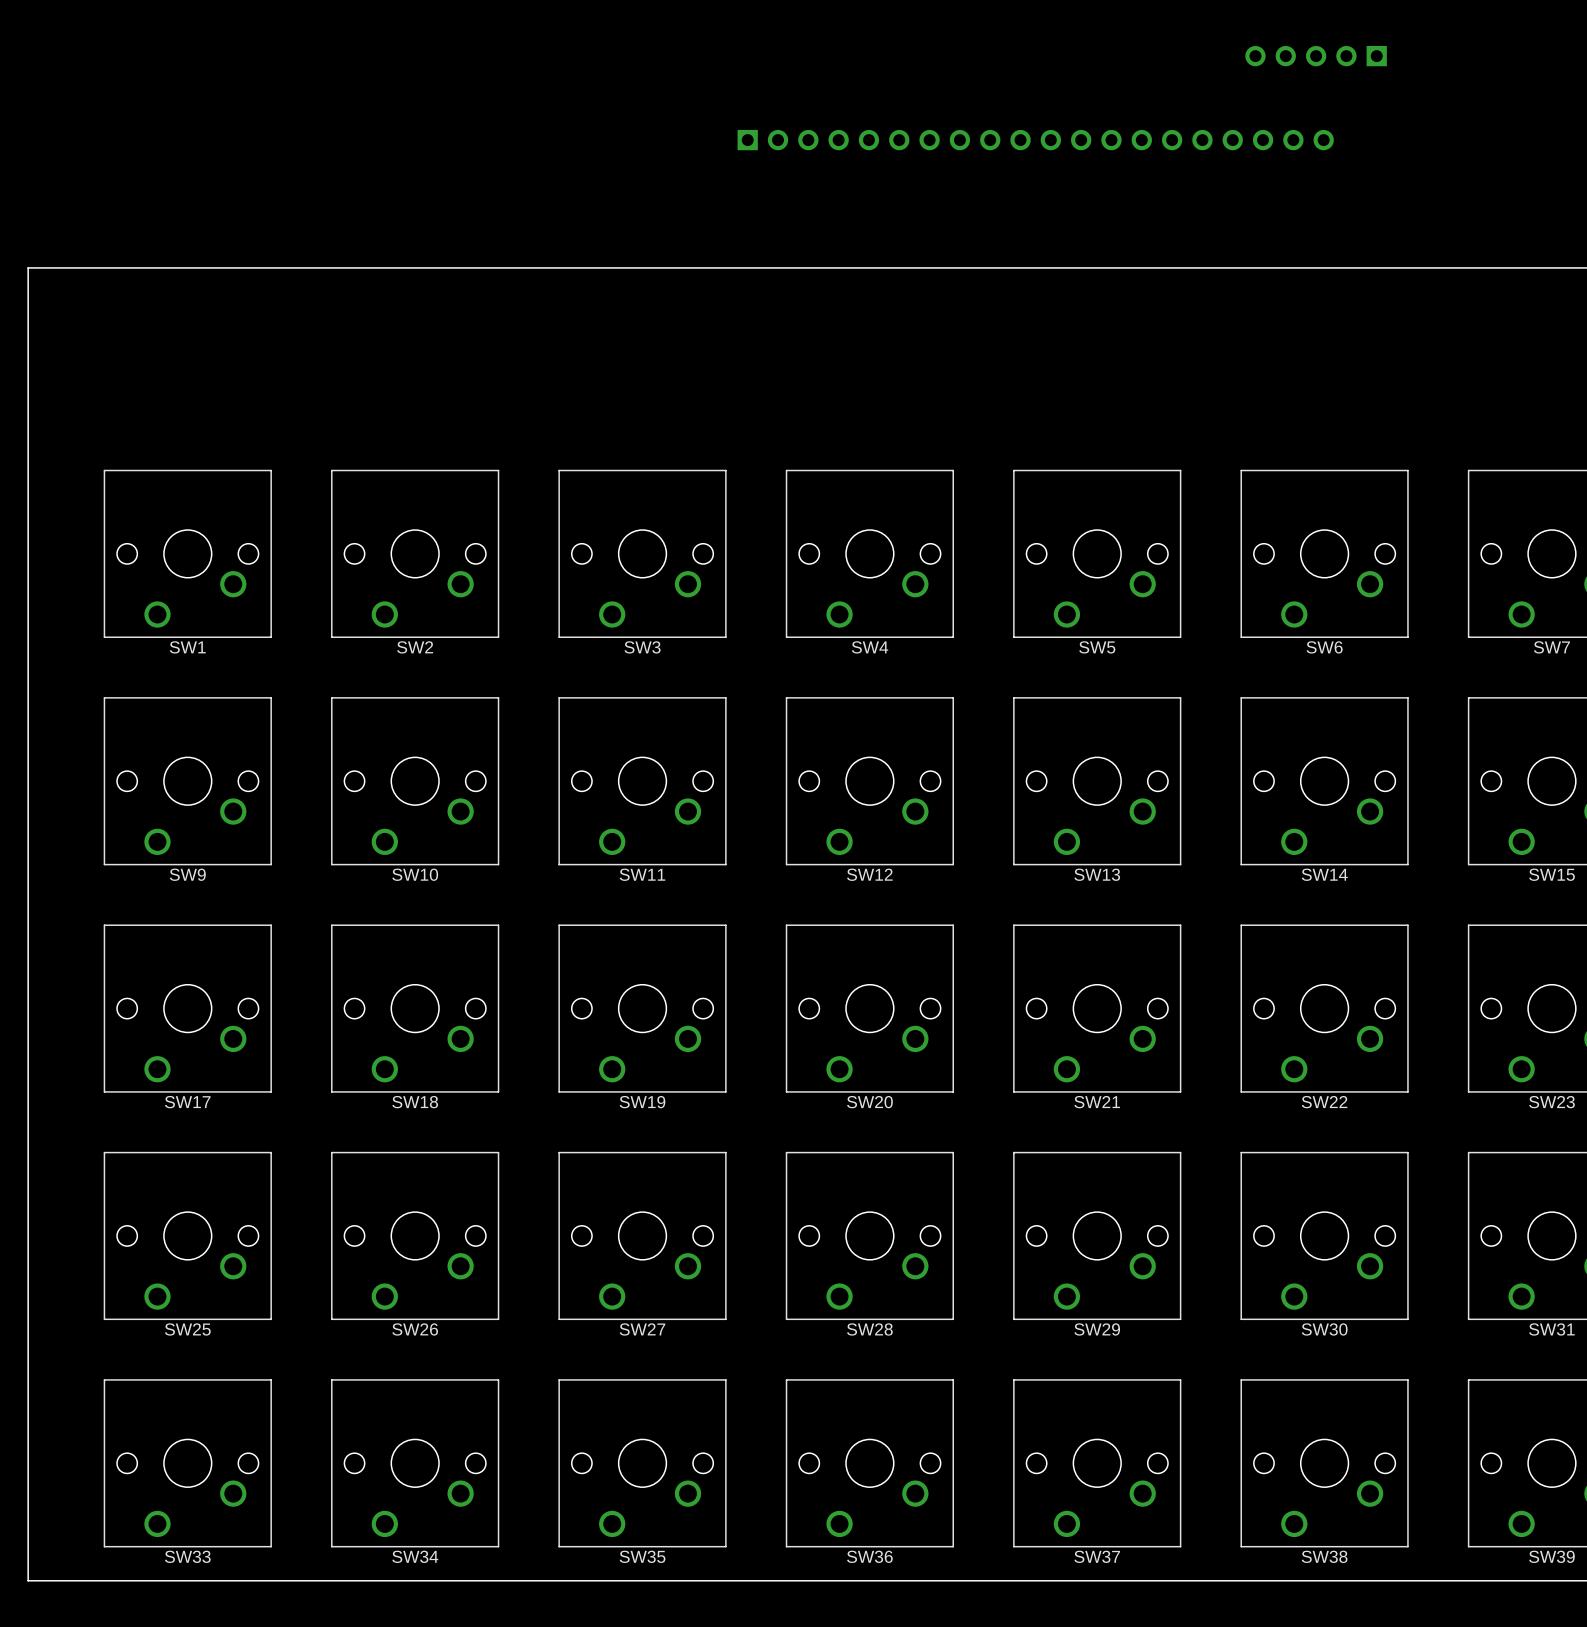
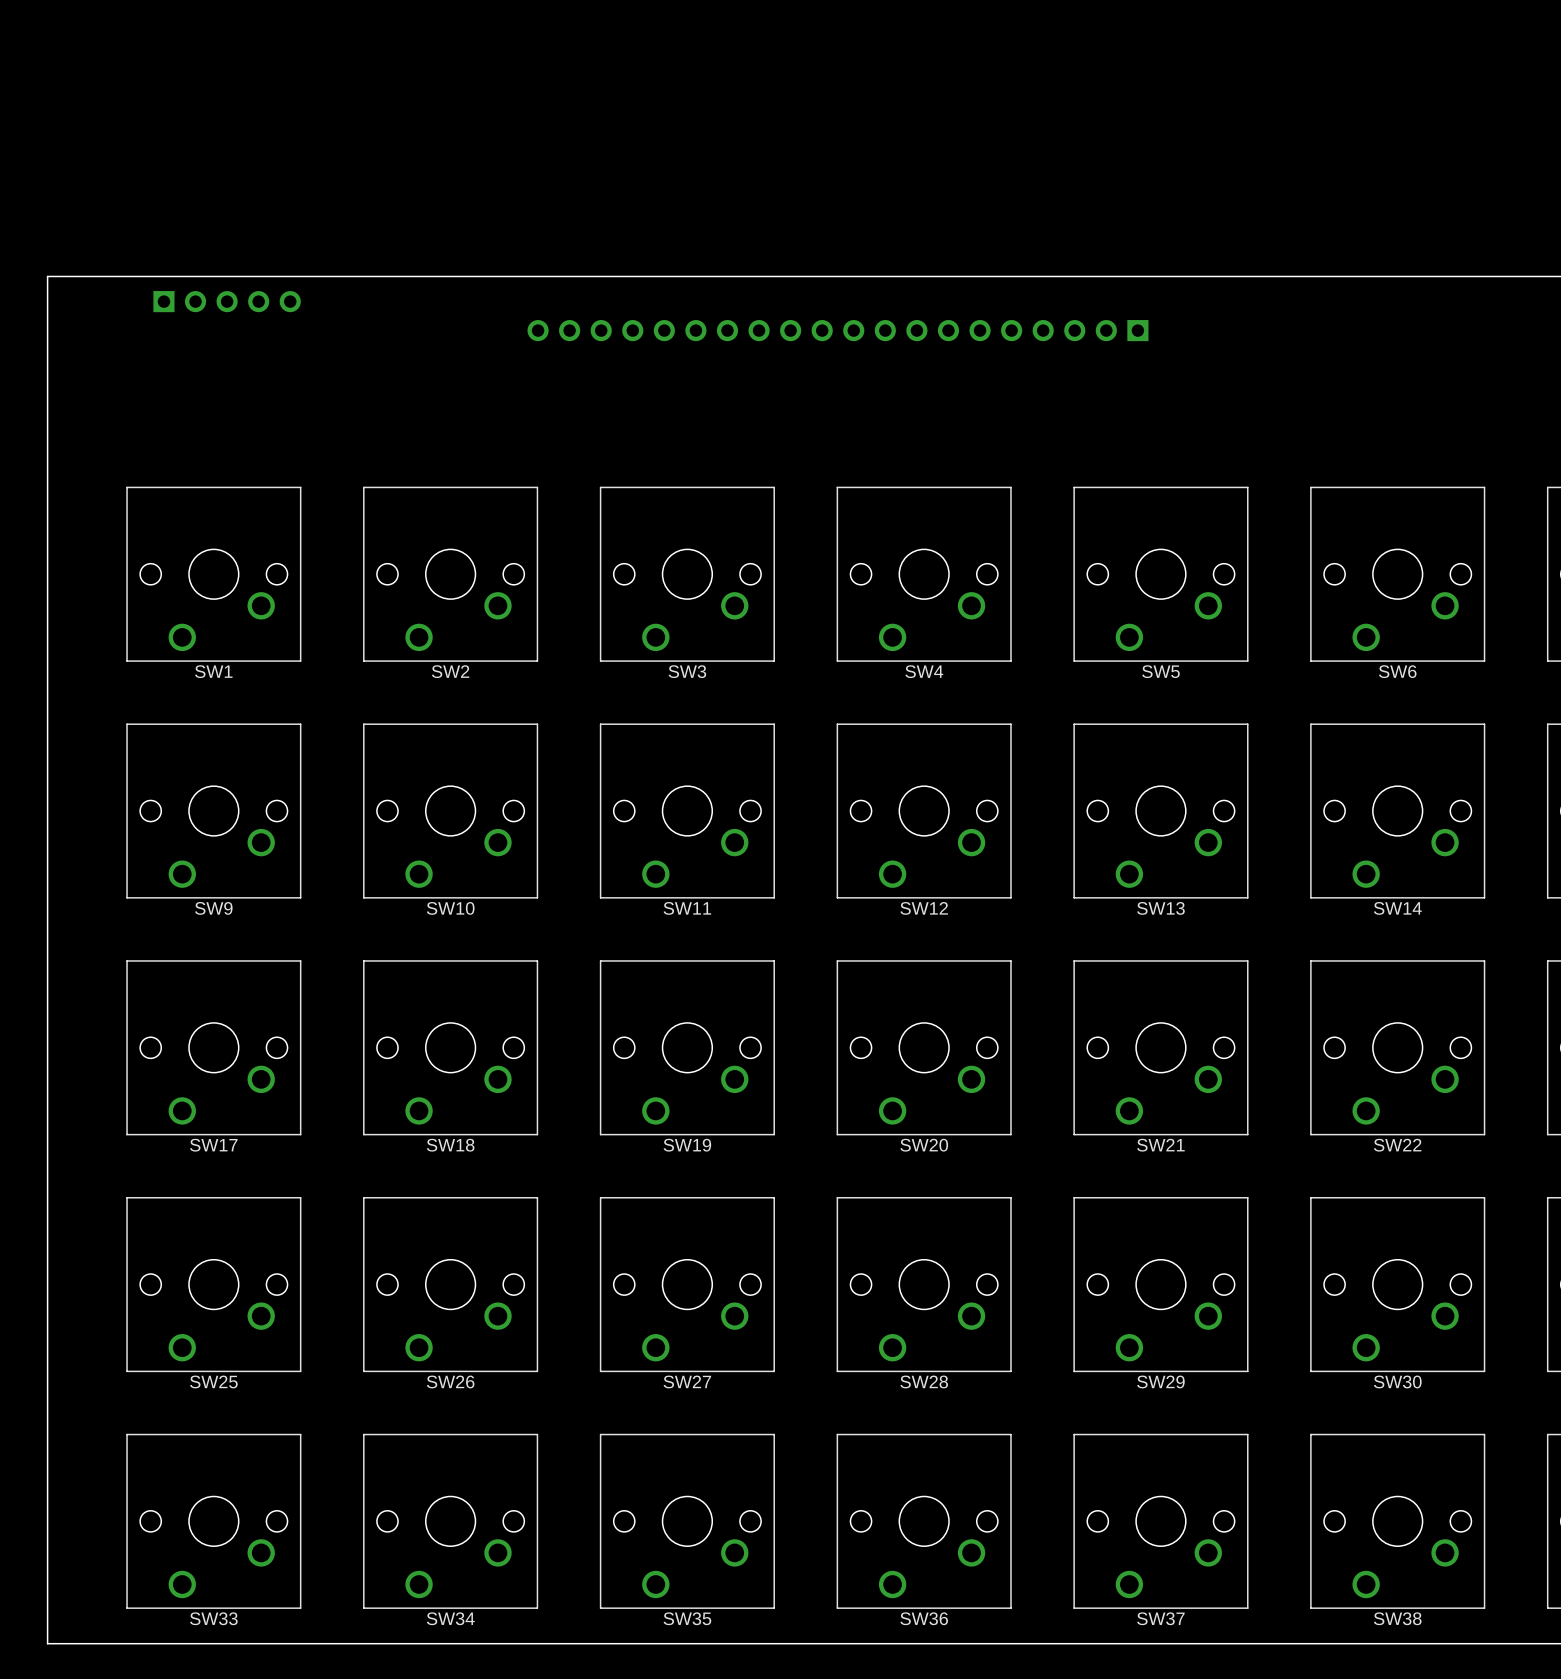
part: (1316, 56) -> none
part: (1035, 140) -> none
part: none -> (227, 301)
part: none -> (837, 330)

